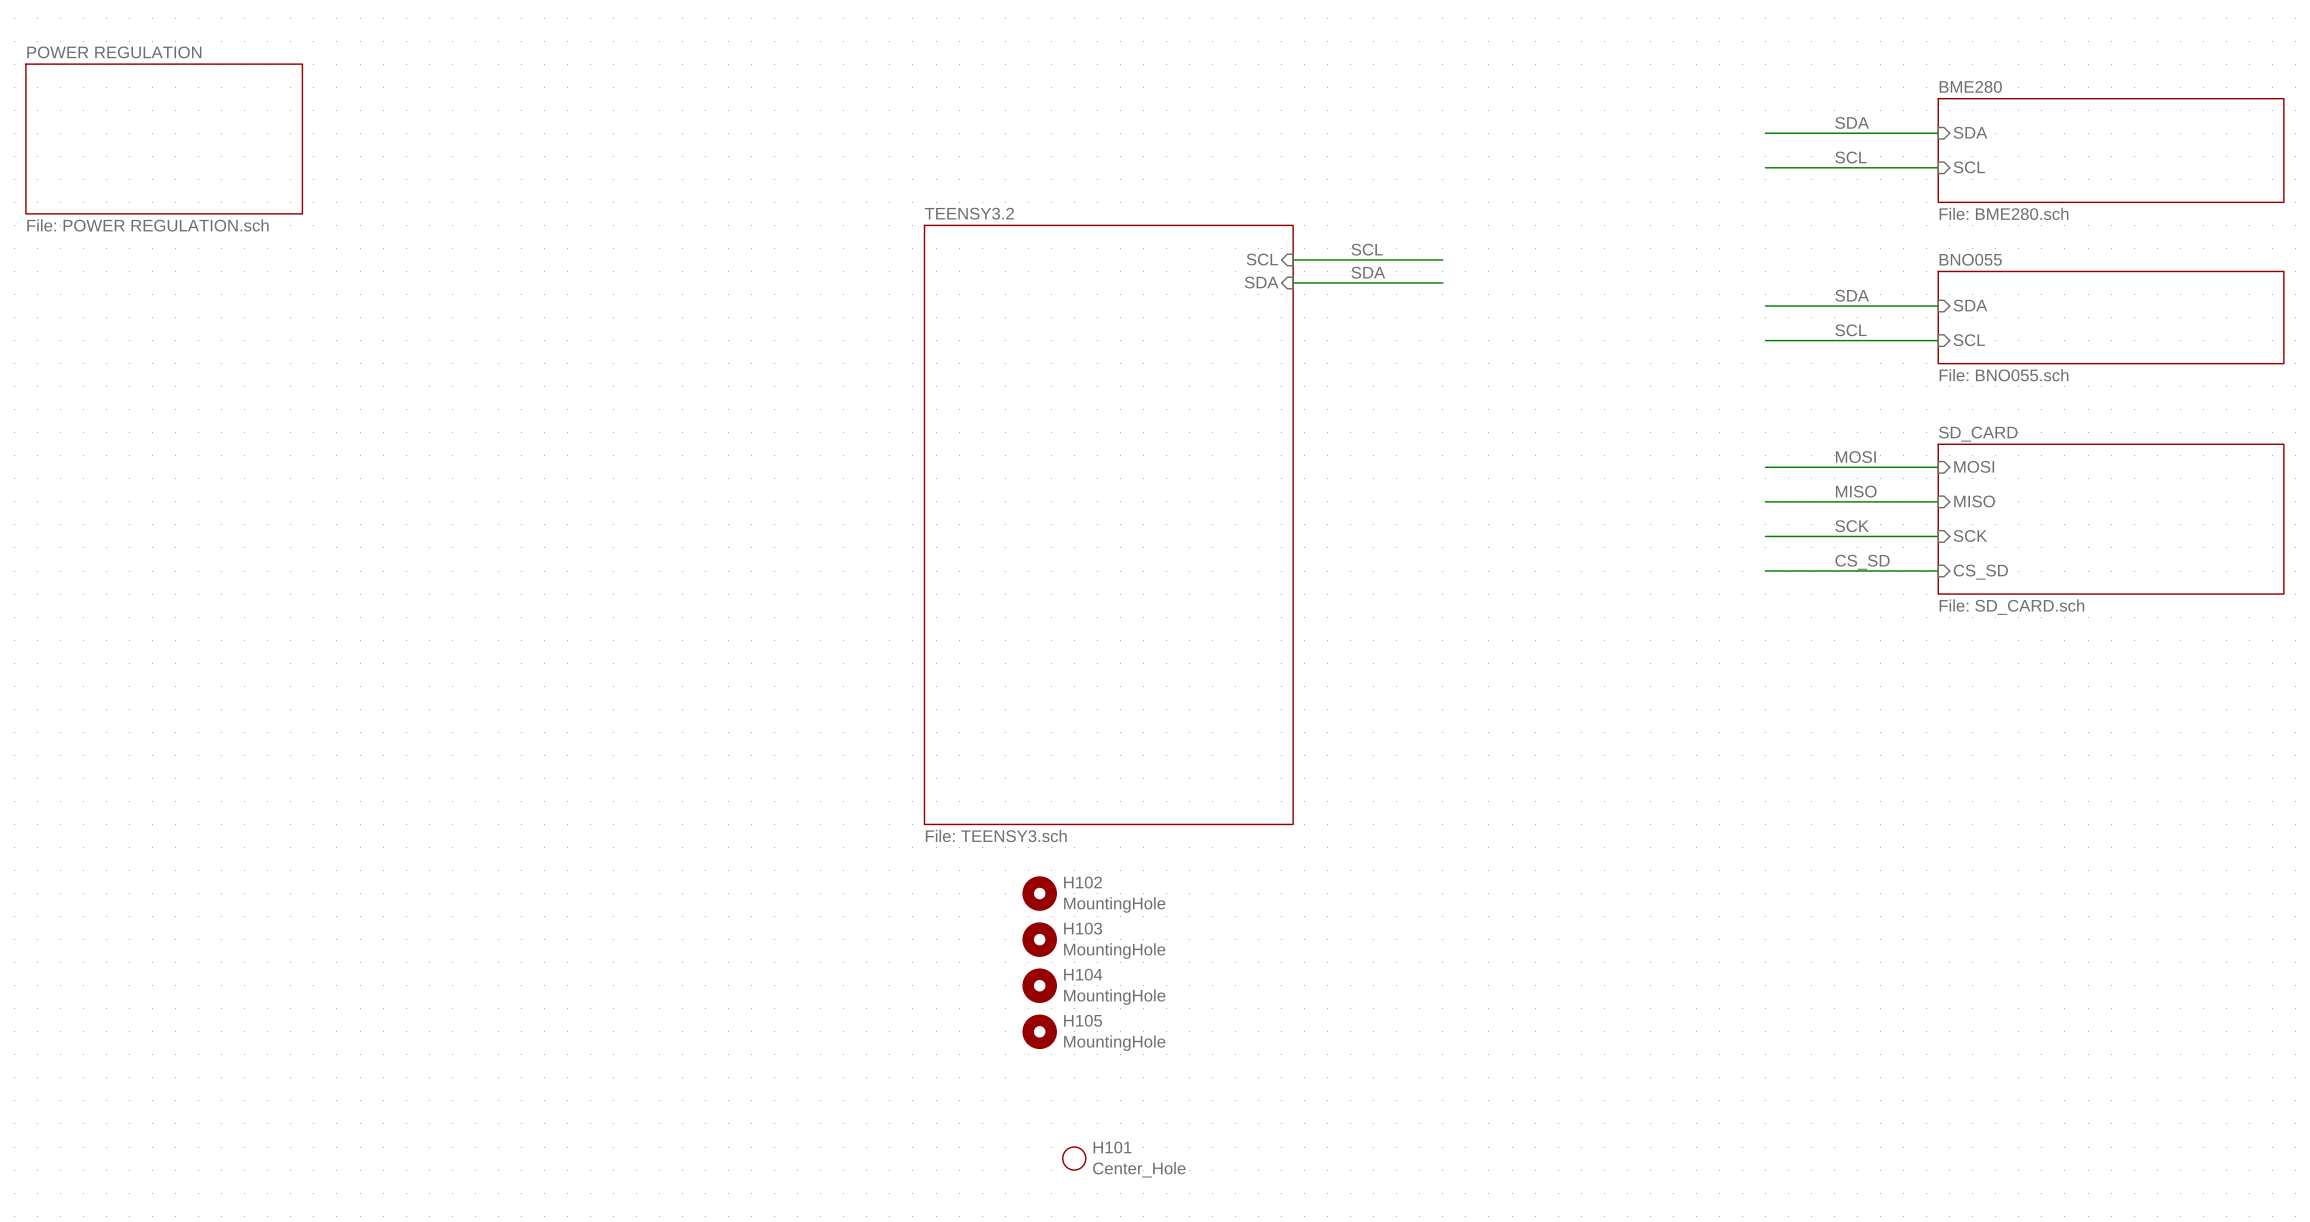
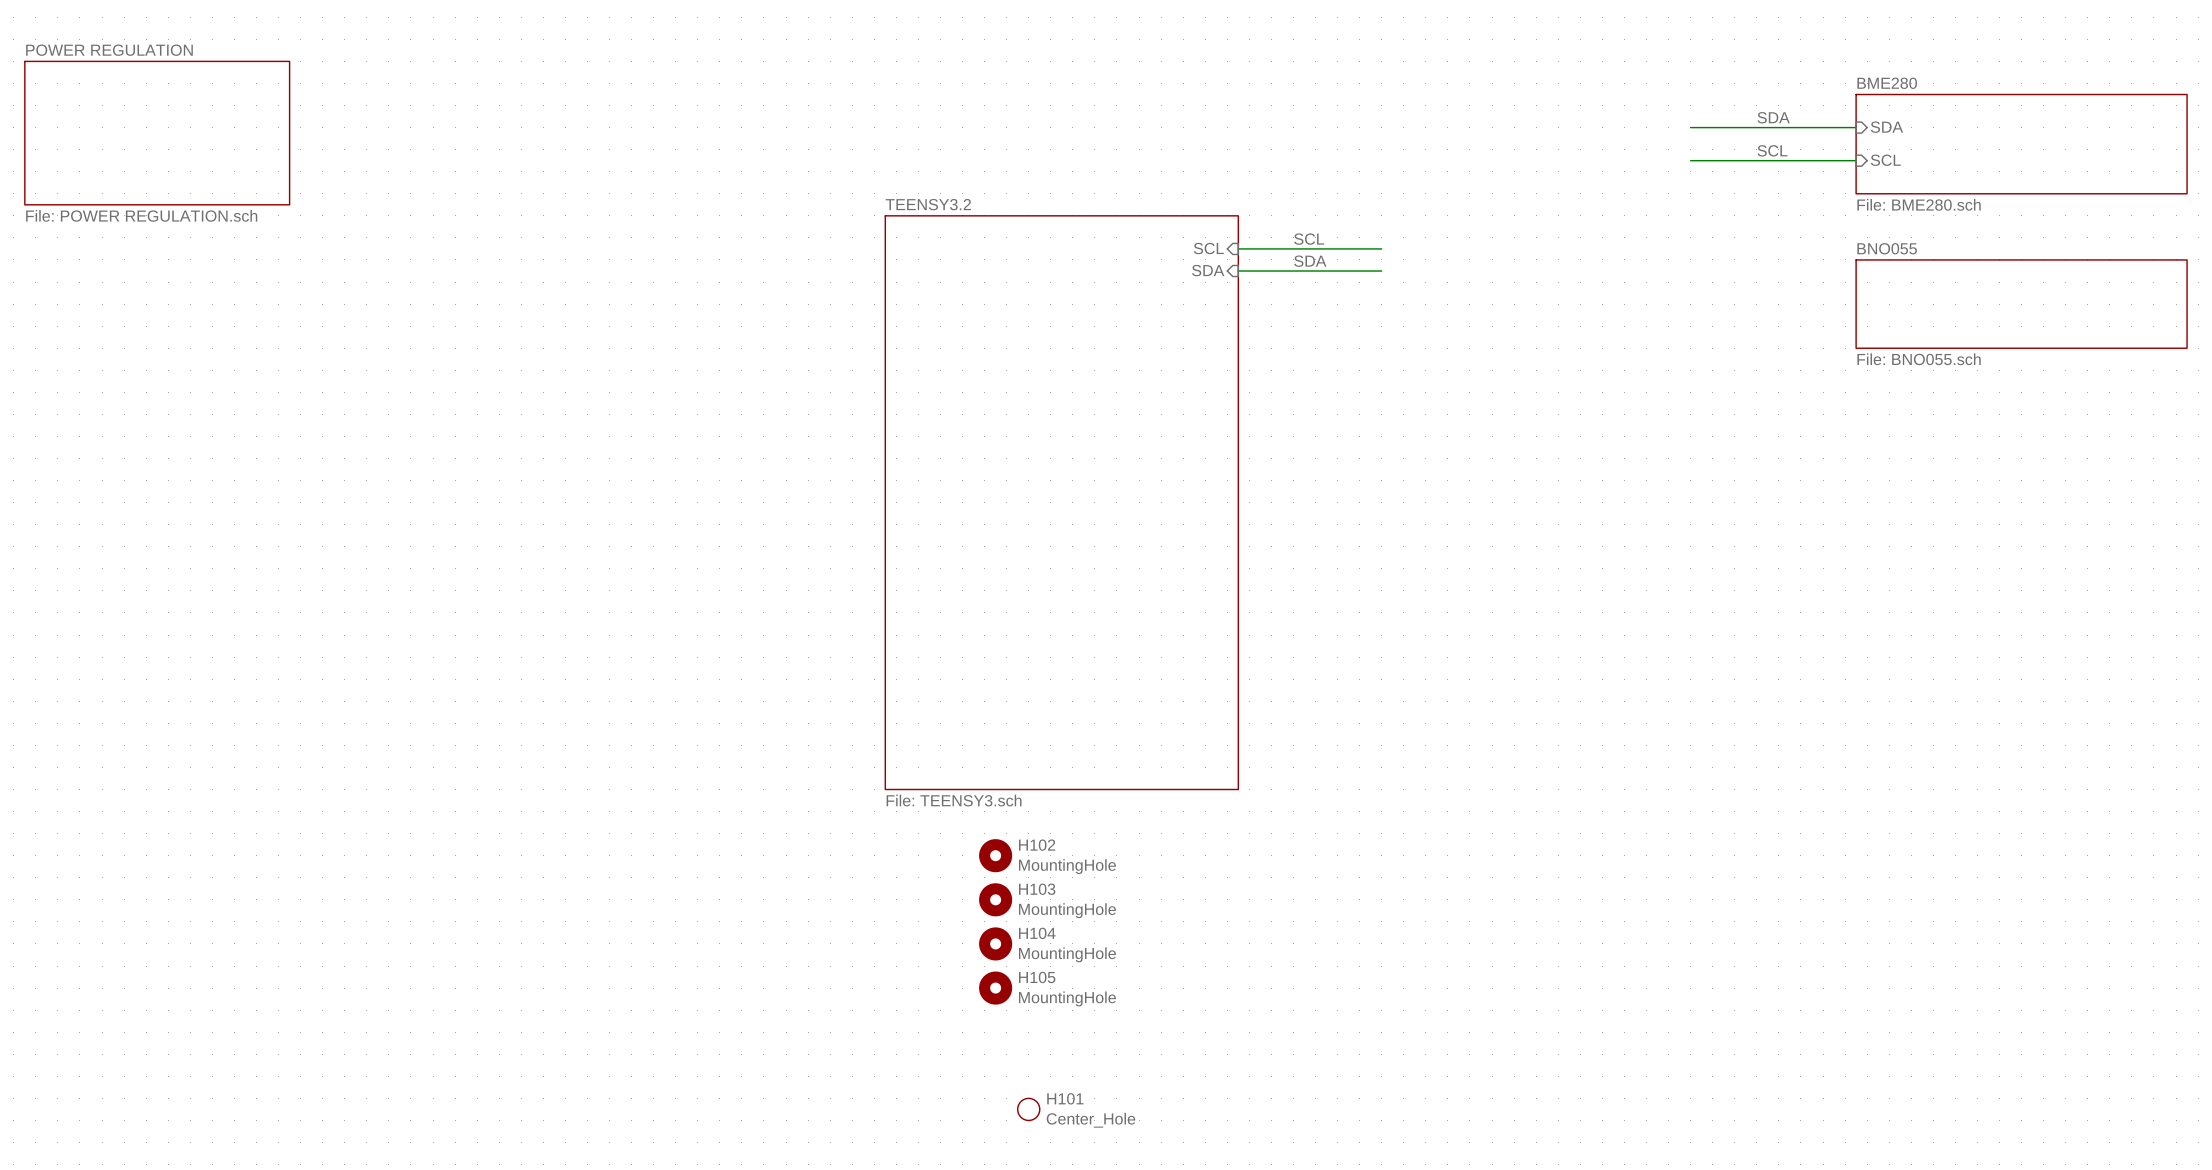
label: SDA (1852, 295) -> none
sheet pin: SDA (1970, 305) -> none
wire: (1765, 306) (1938, 306) -> none
label: SCL (1850, 330) -> none
wire: (1765, 340) (1938, 340) -> none
sheet pin: SCL (1969, 340) -> none
label: MOSI (1855, 457) -> none
sheet pin: MOSI (1974, 466) -> none
wire: (1765, 467) (1938, 467) -> none
label: MISO (1856, 491) -> none
wire: (1765, 501) (1938, 501) -> none
sheet pin: MISO (1974, 501) -> none
sheet SD_CARD: File: SD_CARD.sch (2111, 519) -> none
label: SCK (1852, 526) -> none
wire: (1765, 536) (1938, 536) -> none
sheet pin: SCK (1970, 536) -> none
label: CS_SD (1862, 562) -> none
wire: (1765, 571) (1938, 571) -> none
sheet pin: CS_SD (1980, 572) -> none

